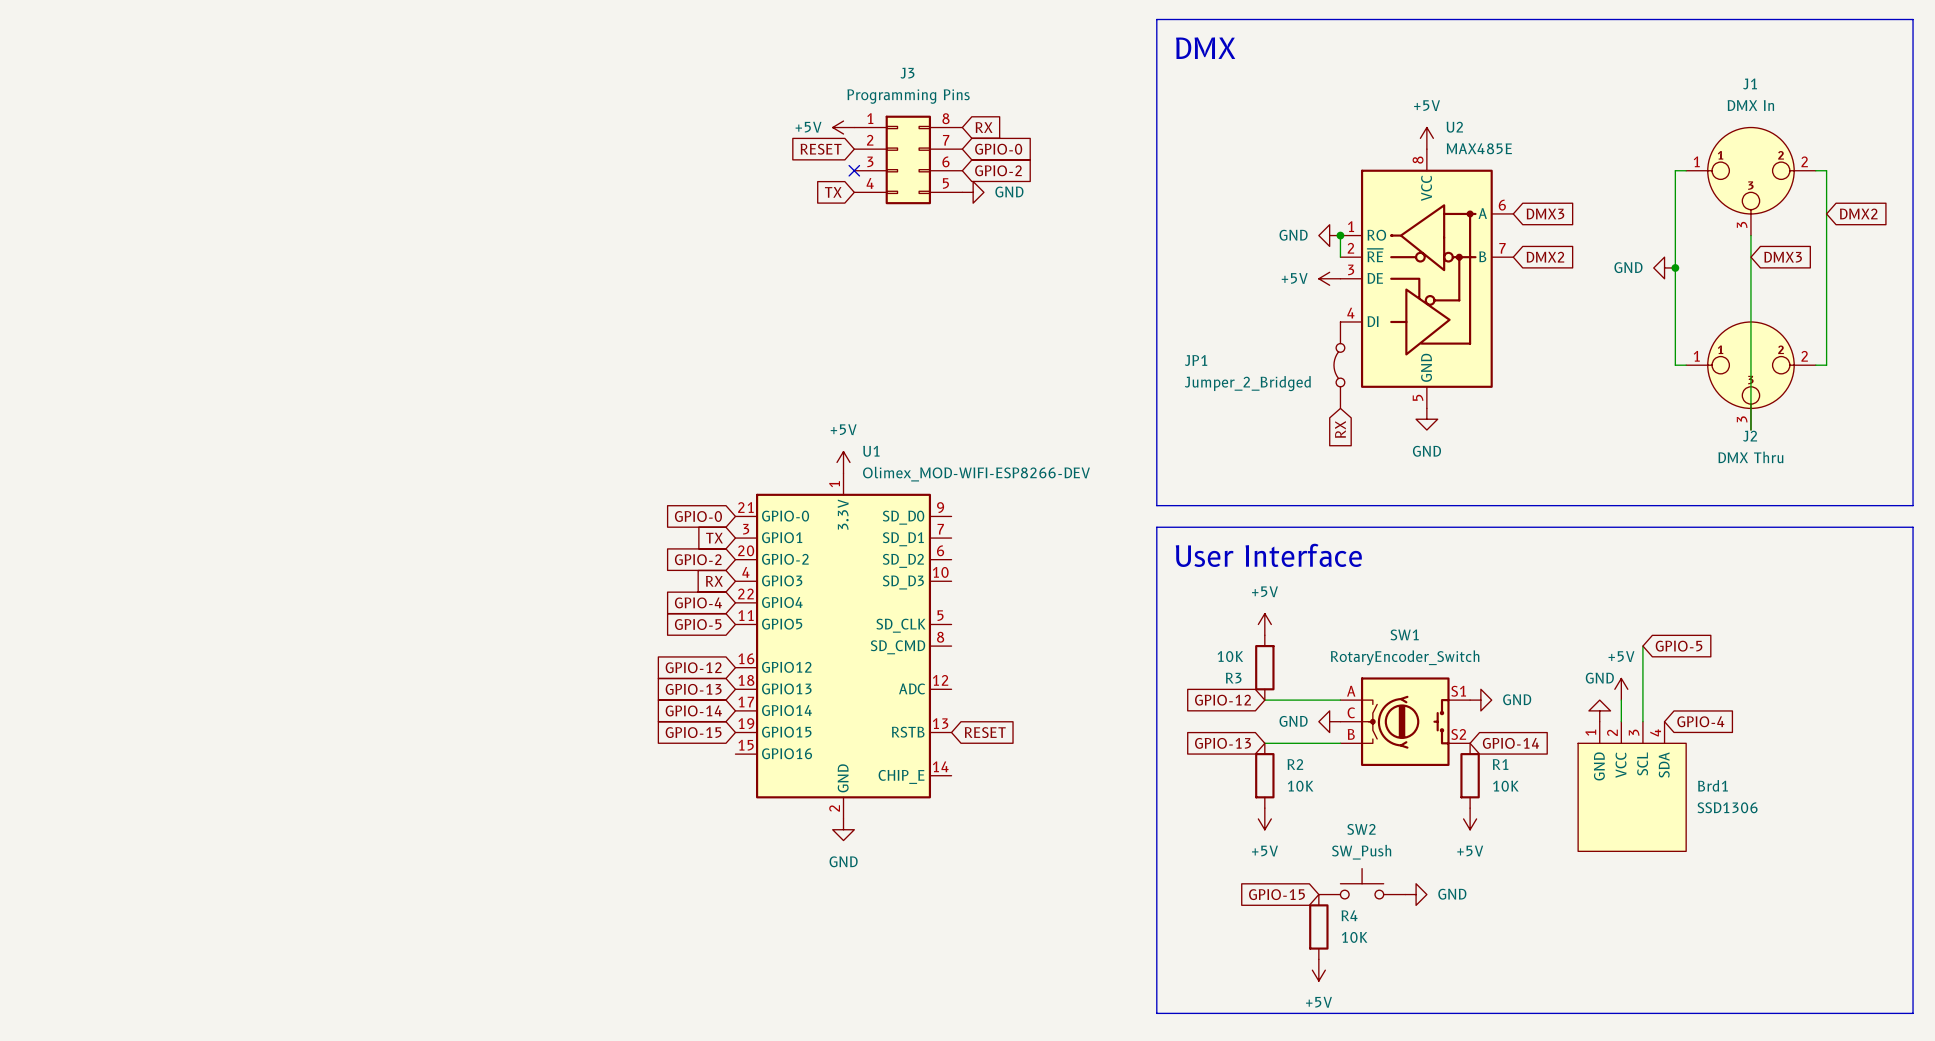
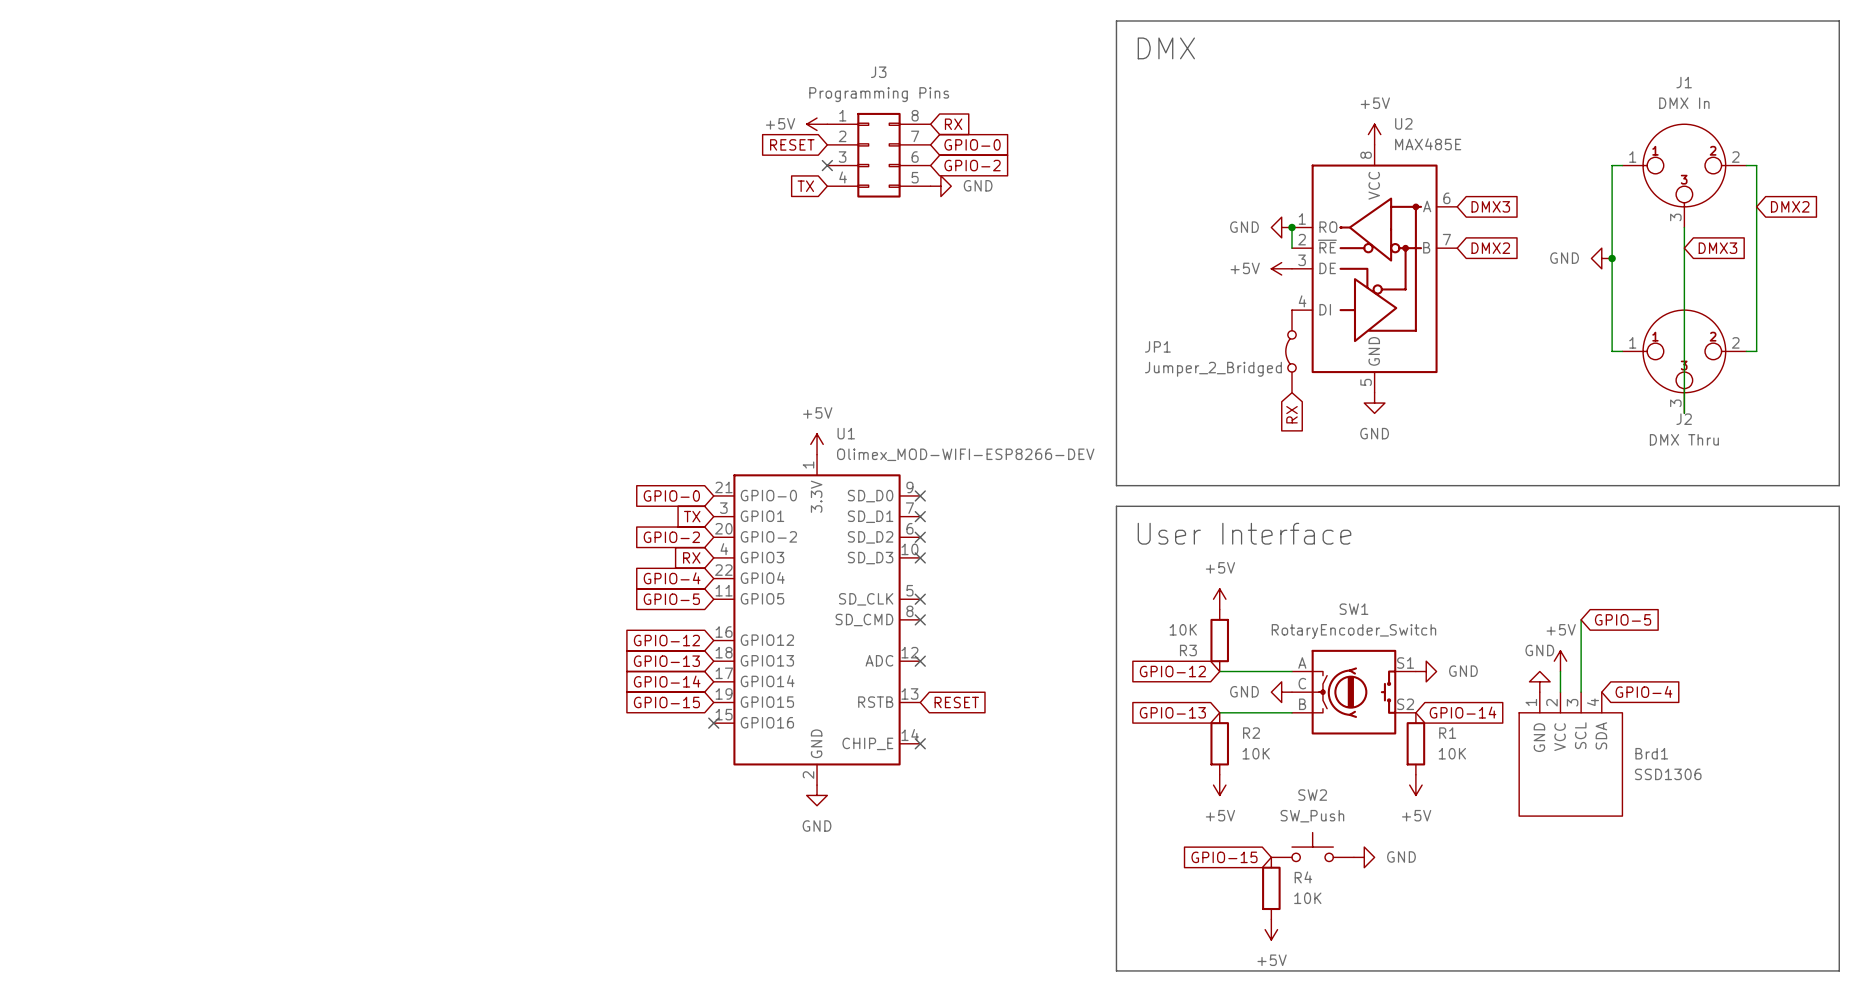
no-connect mark: none -> (920, 495)
no-connect mark: none -> (920, 516)
no-connect mark: none -> (920, 537)
no-connect mark: none -> (920, 557)
no-connect mark: none -> (920, 599)
no-connect mark: none -> (920, 619)
no-connect mark: none -> (920, 661)
no-connect mark: none -> (713, 723)
no-connect mark: none -> (920, 743)

